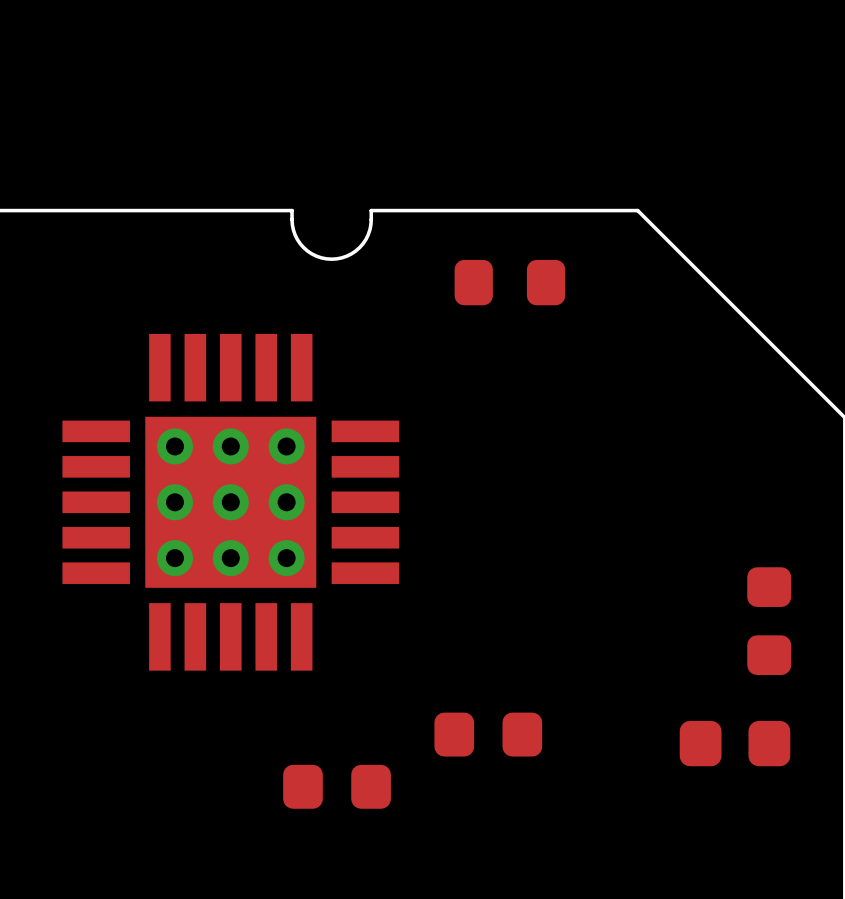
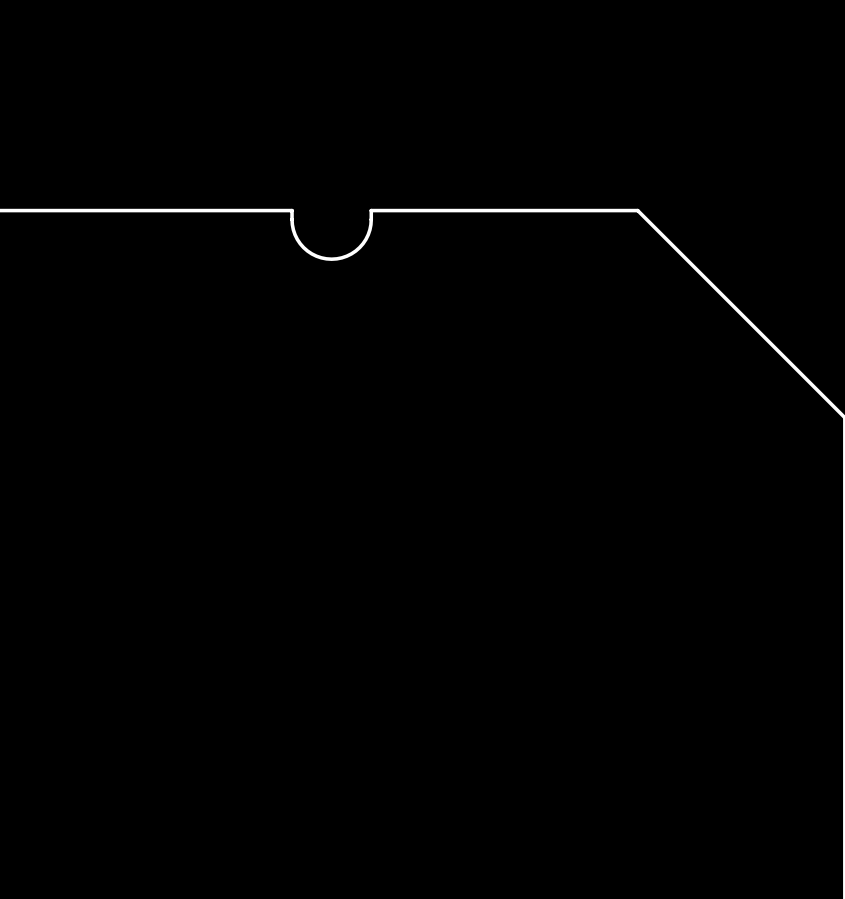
part: (509, 282) -> none
part: (230, 502) -> none
part: (769, 621) -> none
part: (488, 734) -> none
part: (735, 743) -> none
part: (337, 786) -> none

